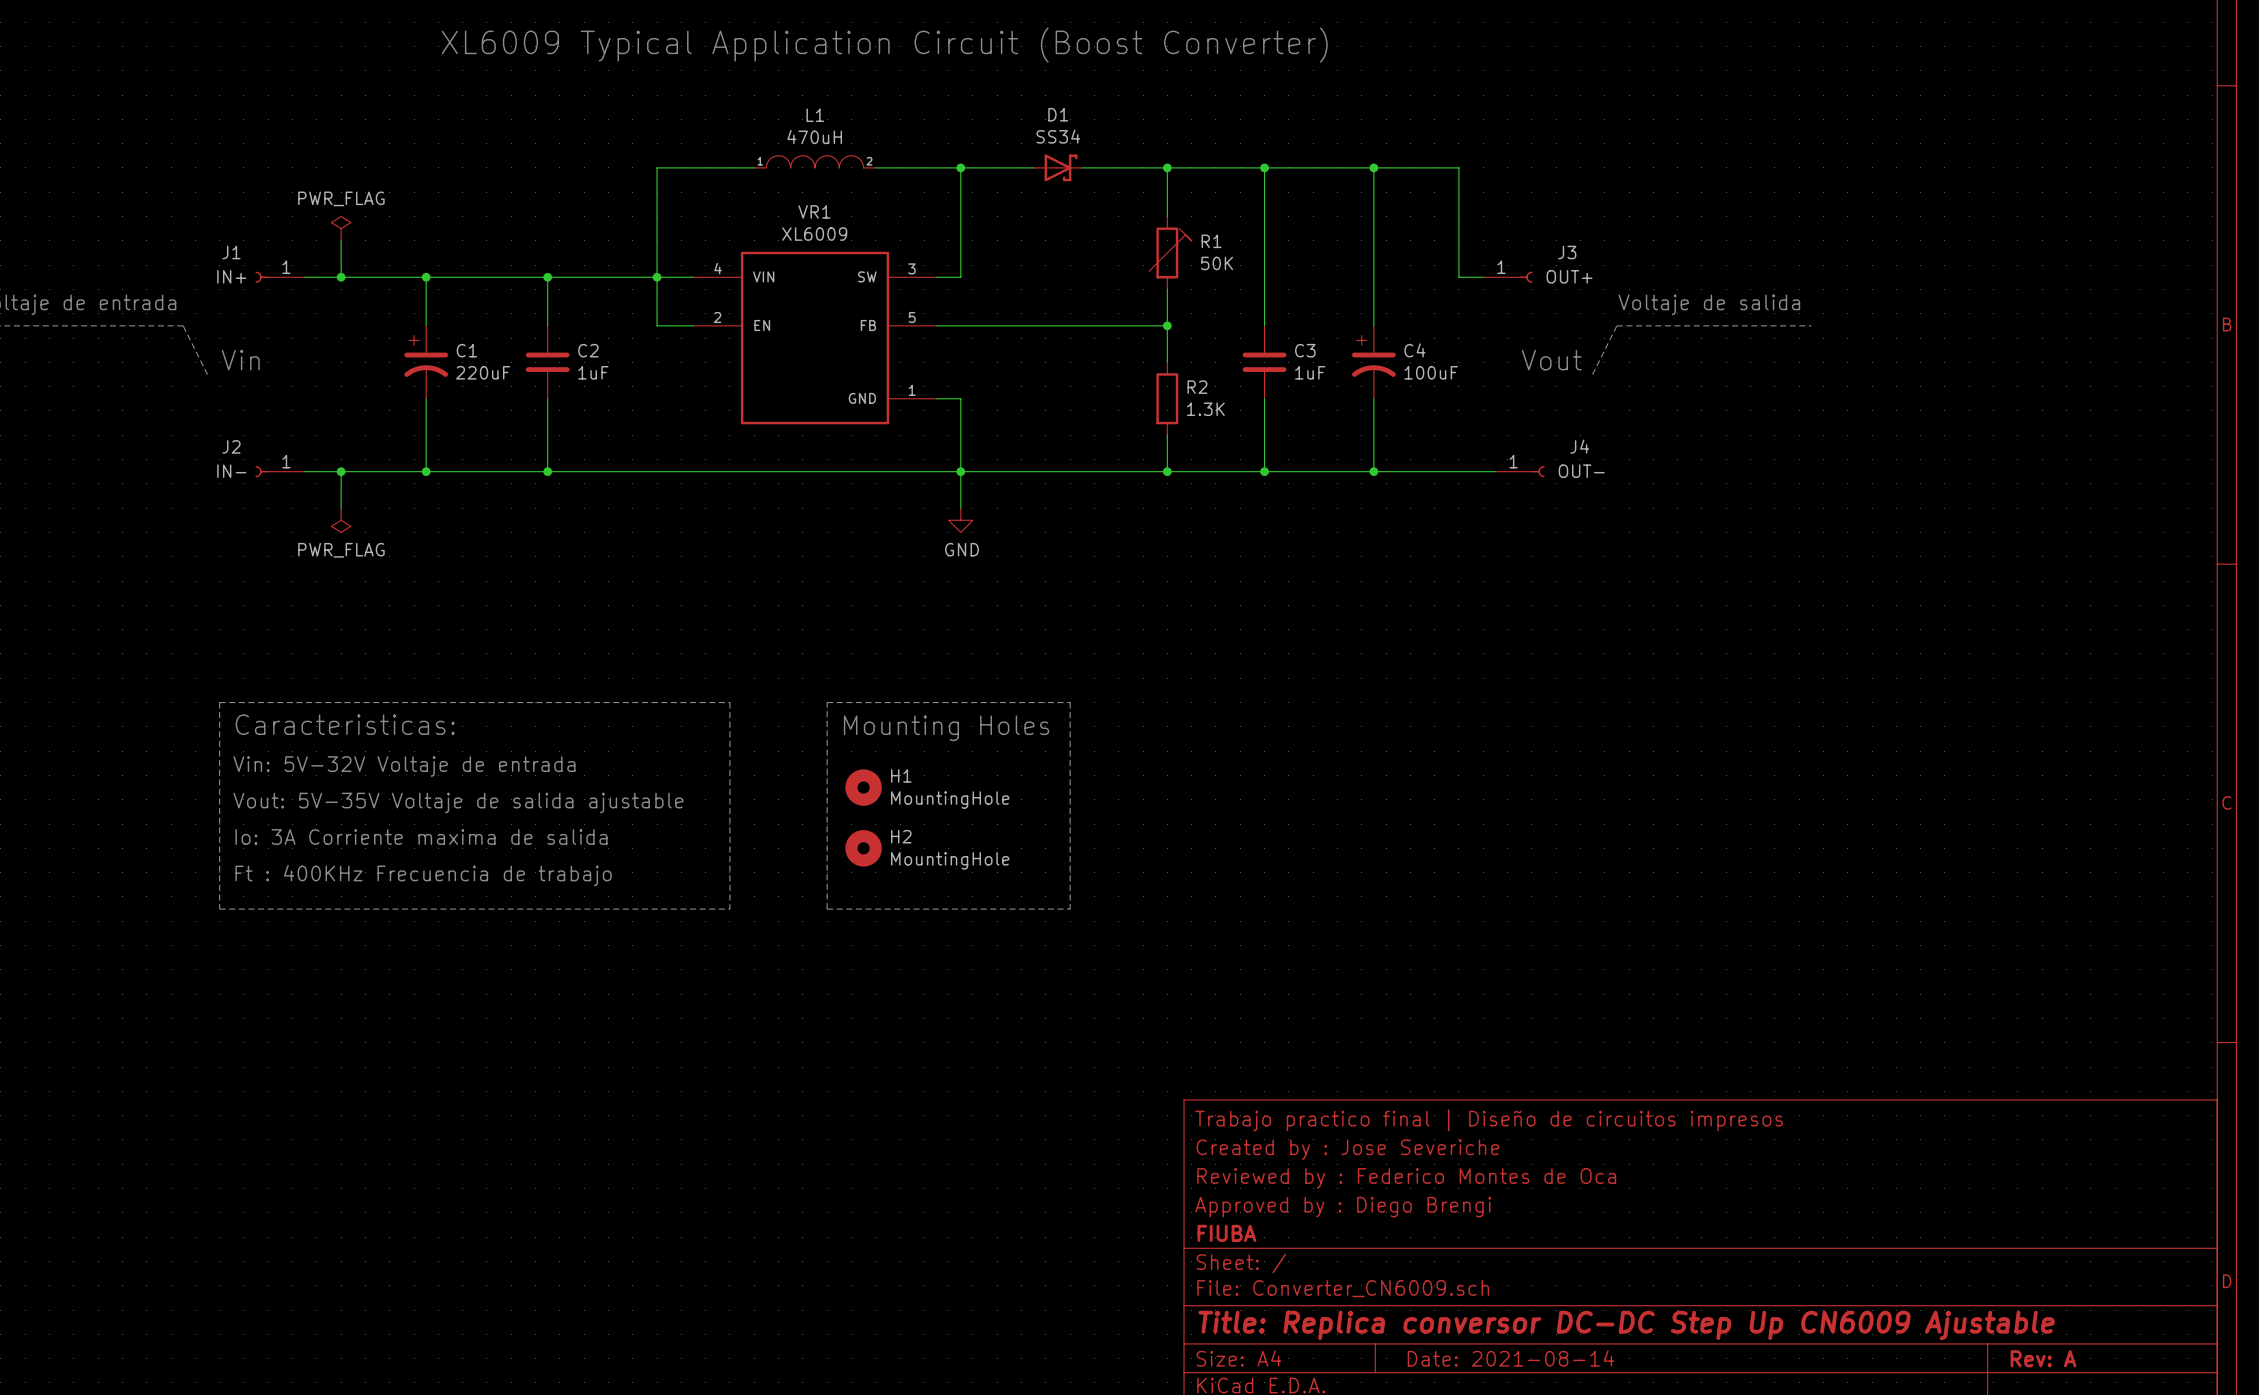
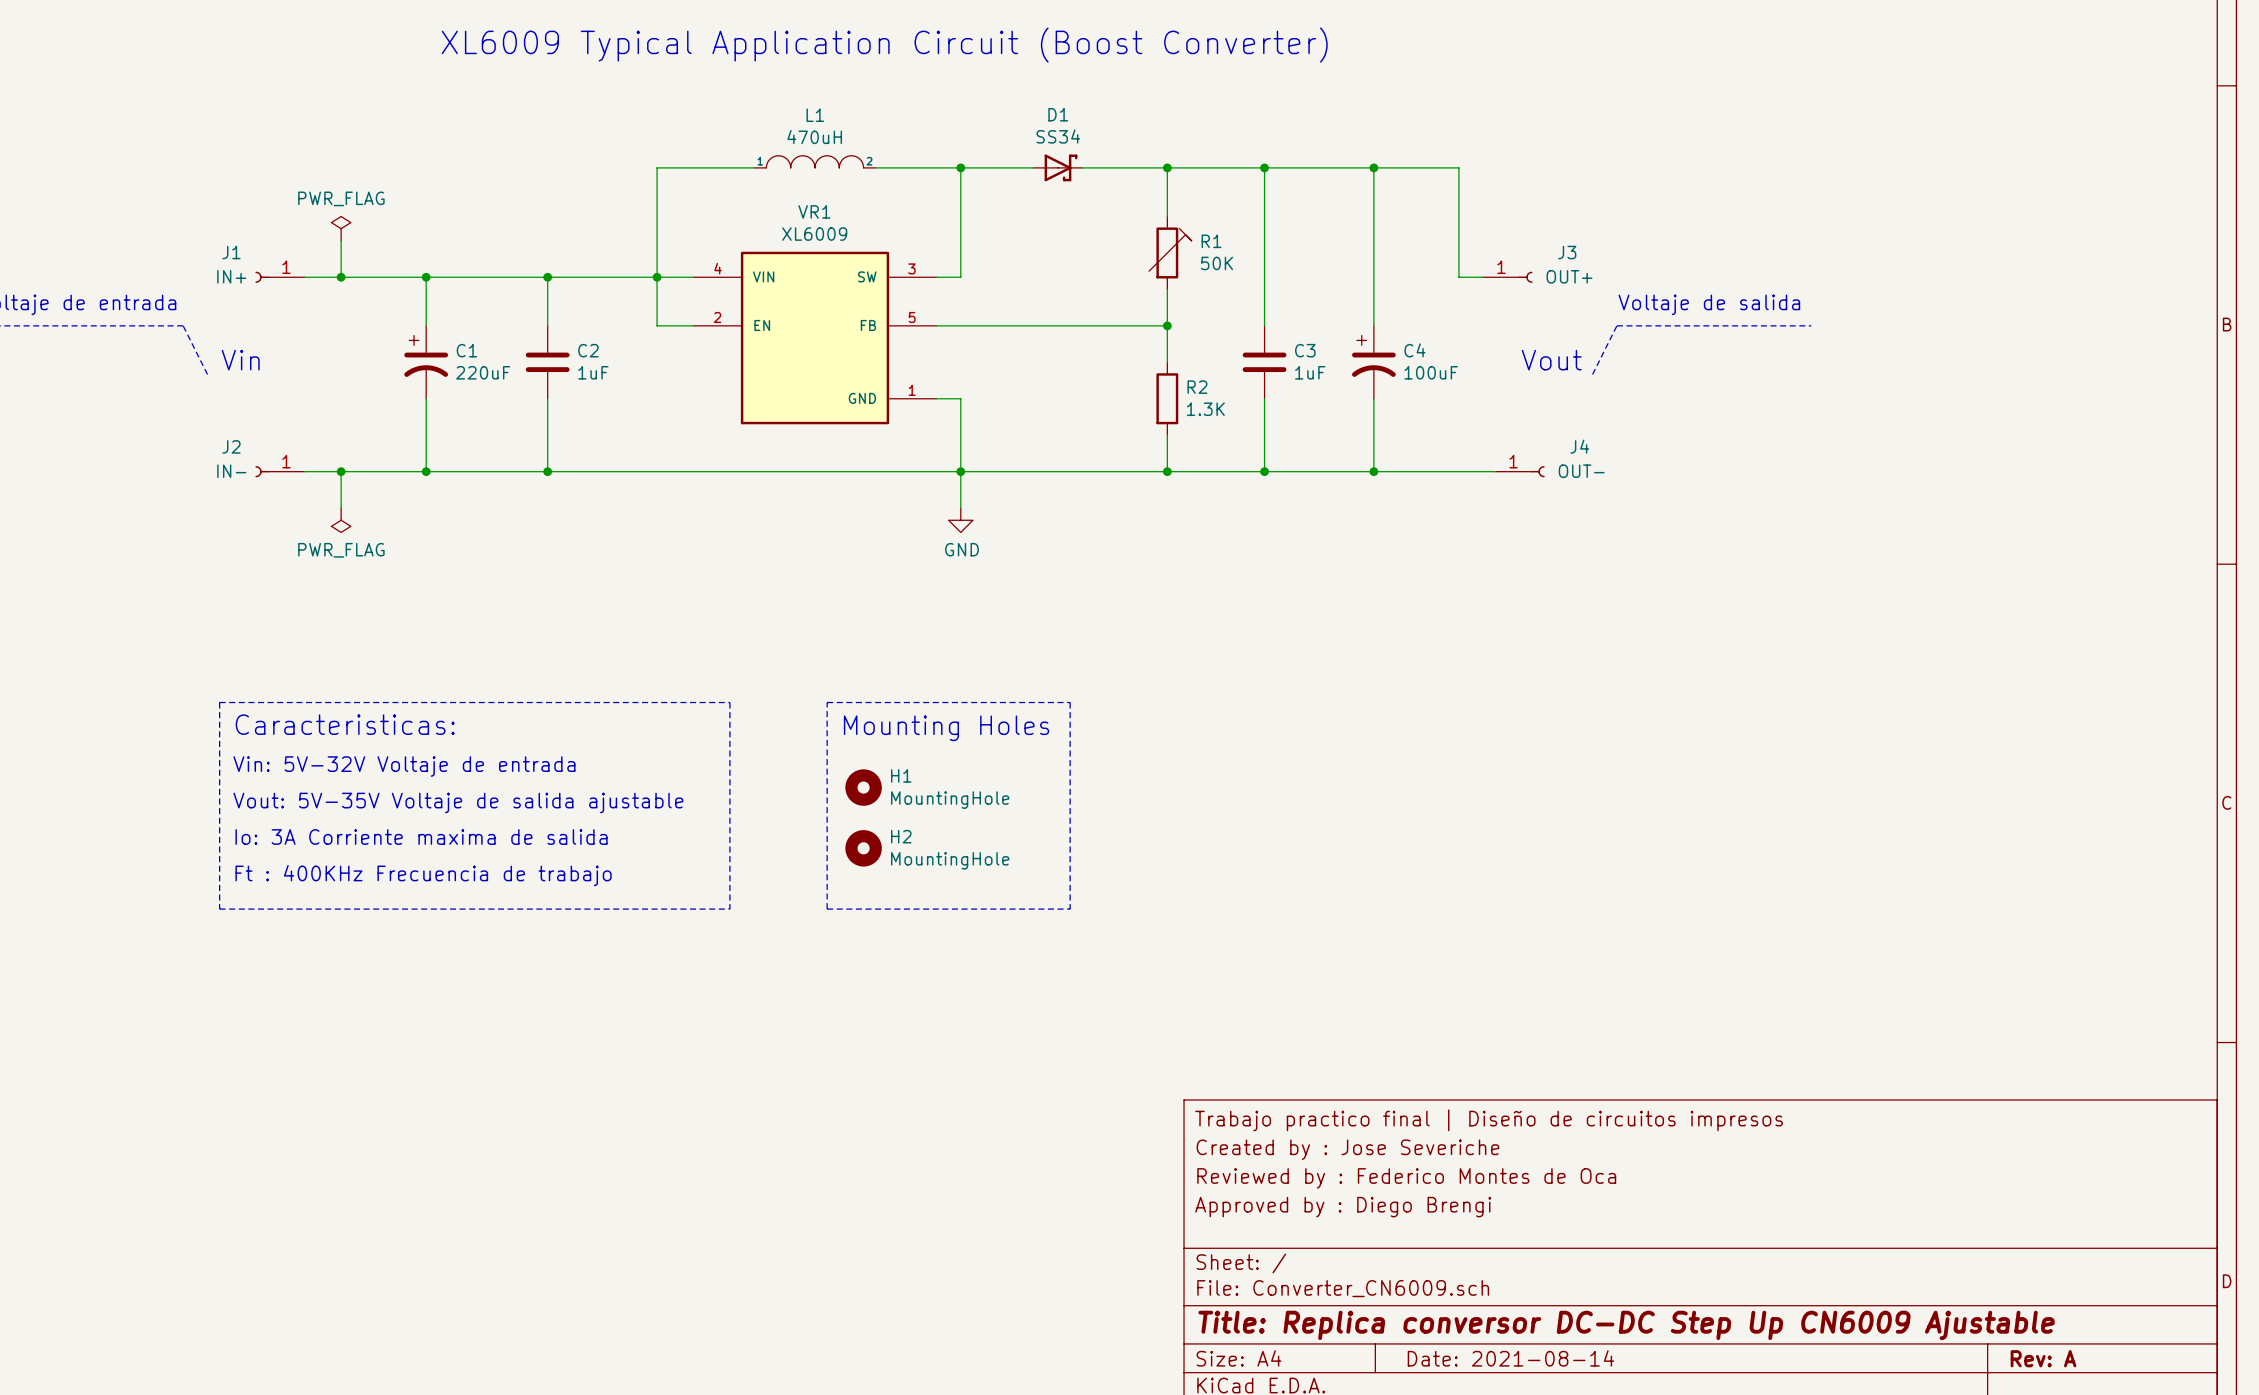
title block: FIUBA (1226, 1233) -> none

